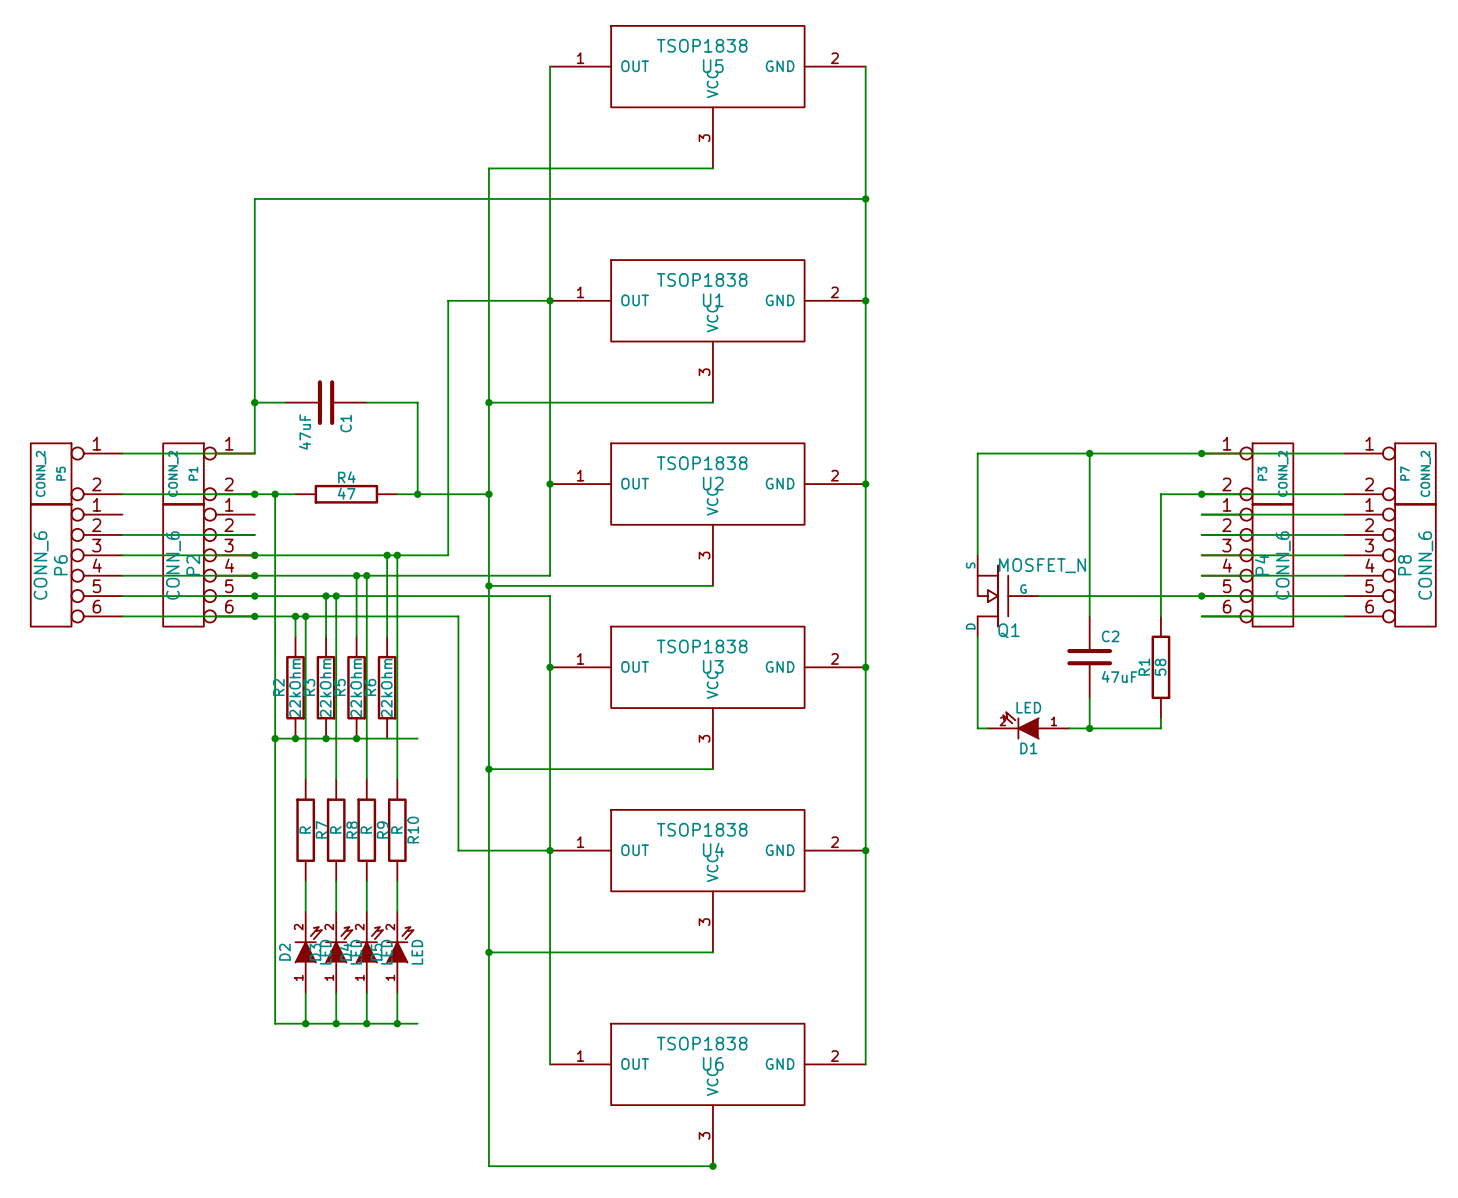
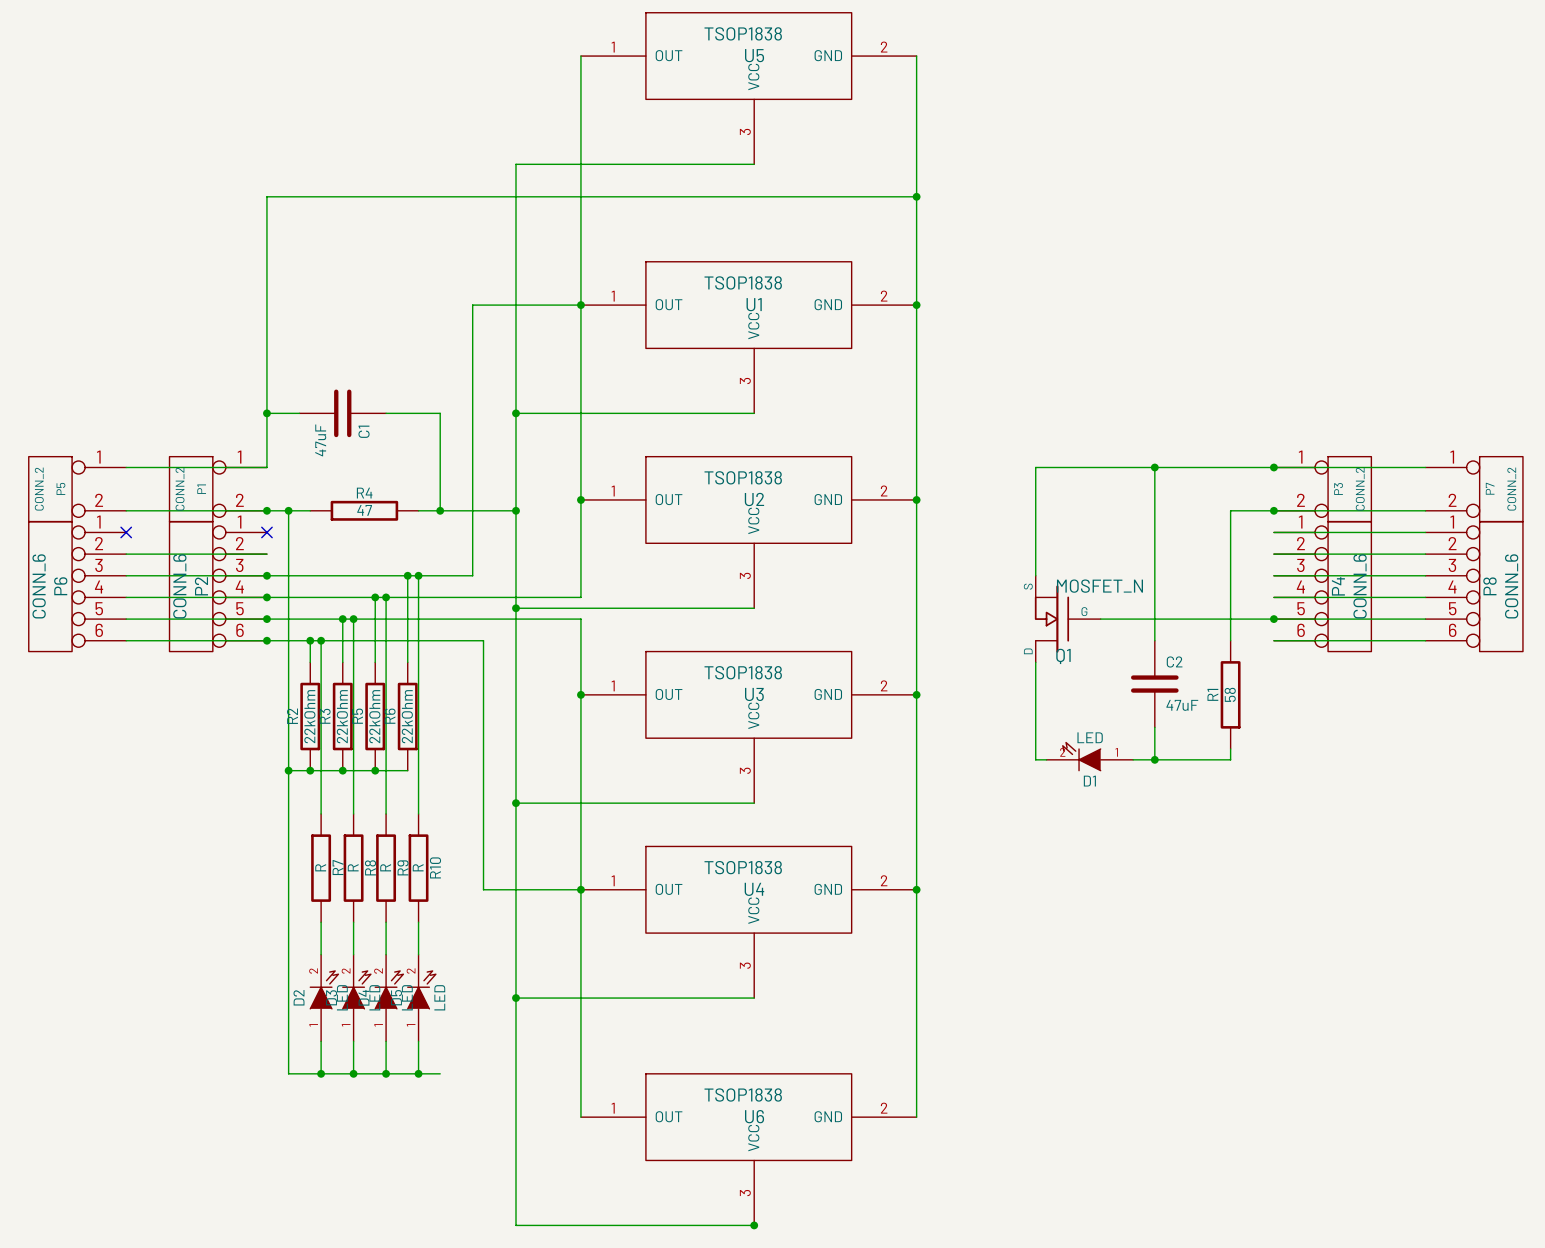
no-connect mark: none -> (126, 532)
no-connect mark: none -> (266, 532)
wire: (387, 738) (417, 738) -> none

